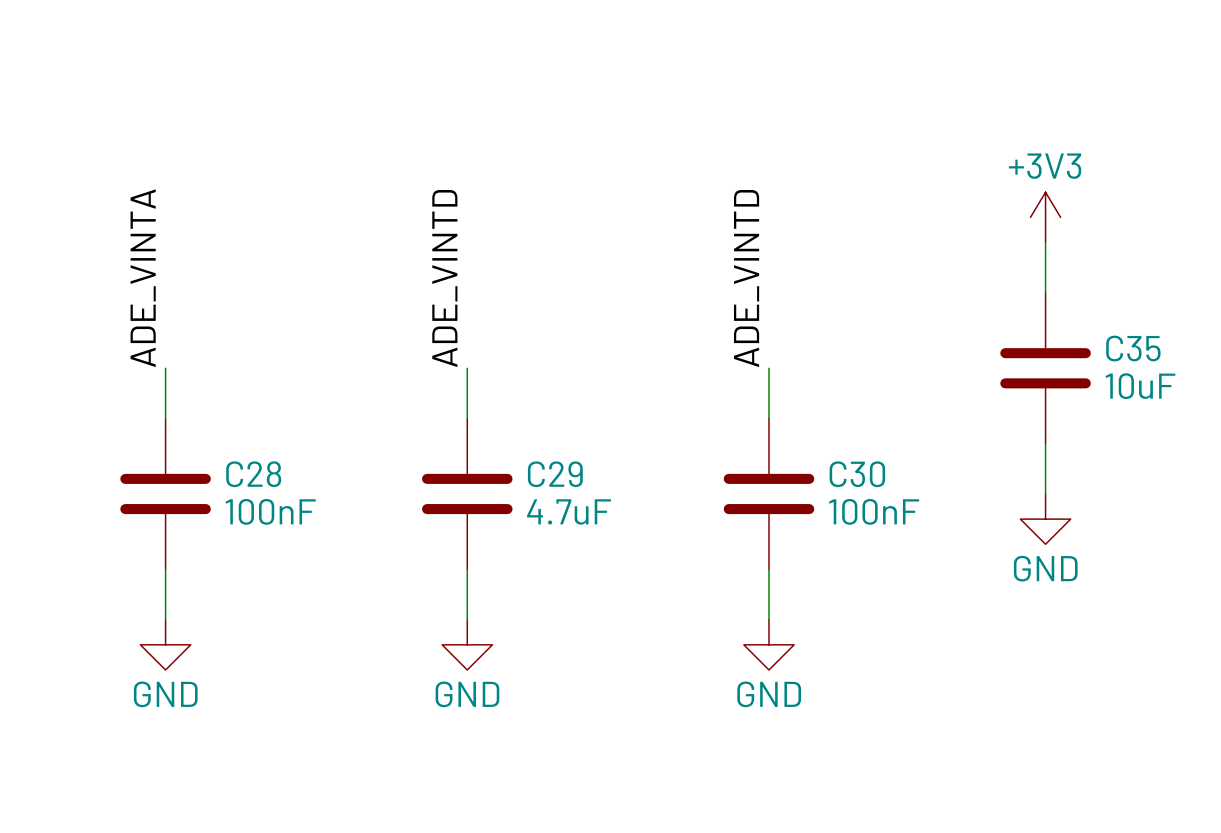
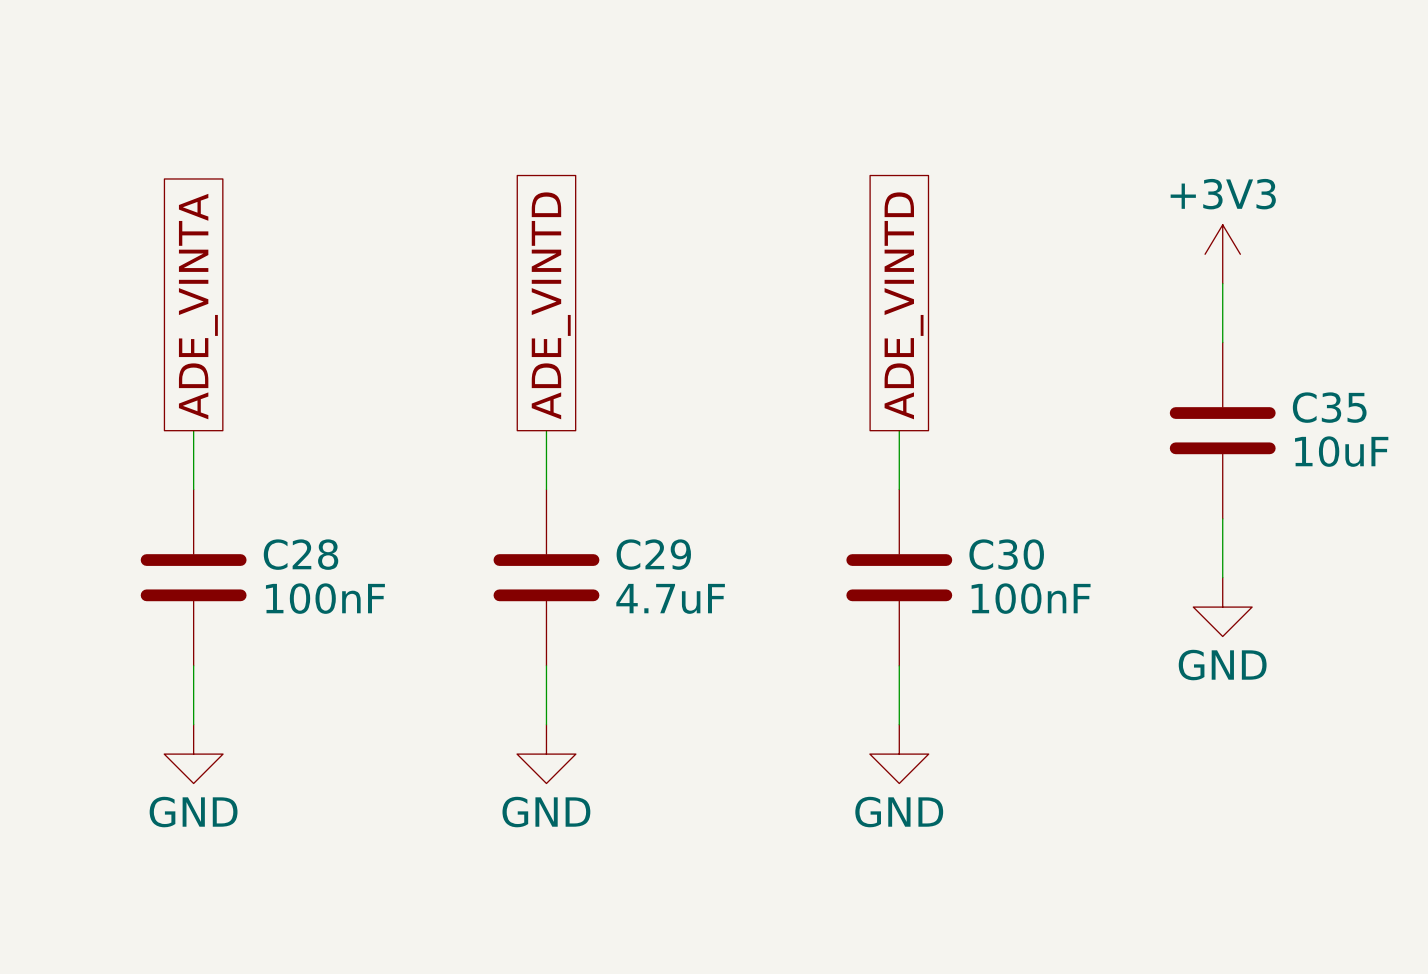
global label: none -> ADE_VINTA (198, 306)
global label: none -> ADE_VINTD (551, 305)
global label: none -> ADE_VINTD (904, 305)
label: ADE_VINTA (143, 278) -> none
label: ADE_VINTD (444, 278) -> none
label: ADE_VINTD (746, 278) -> none

